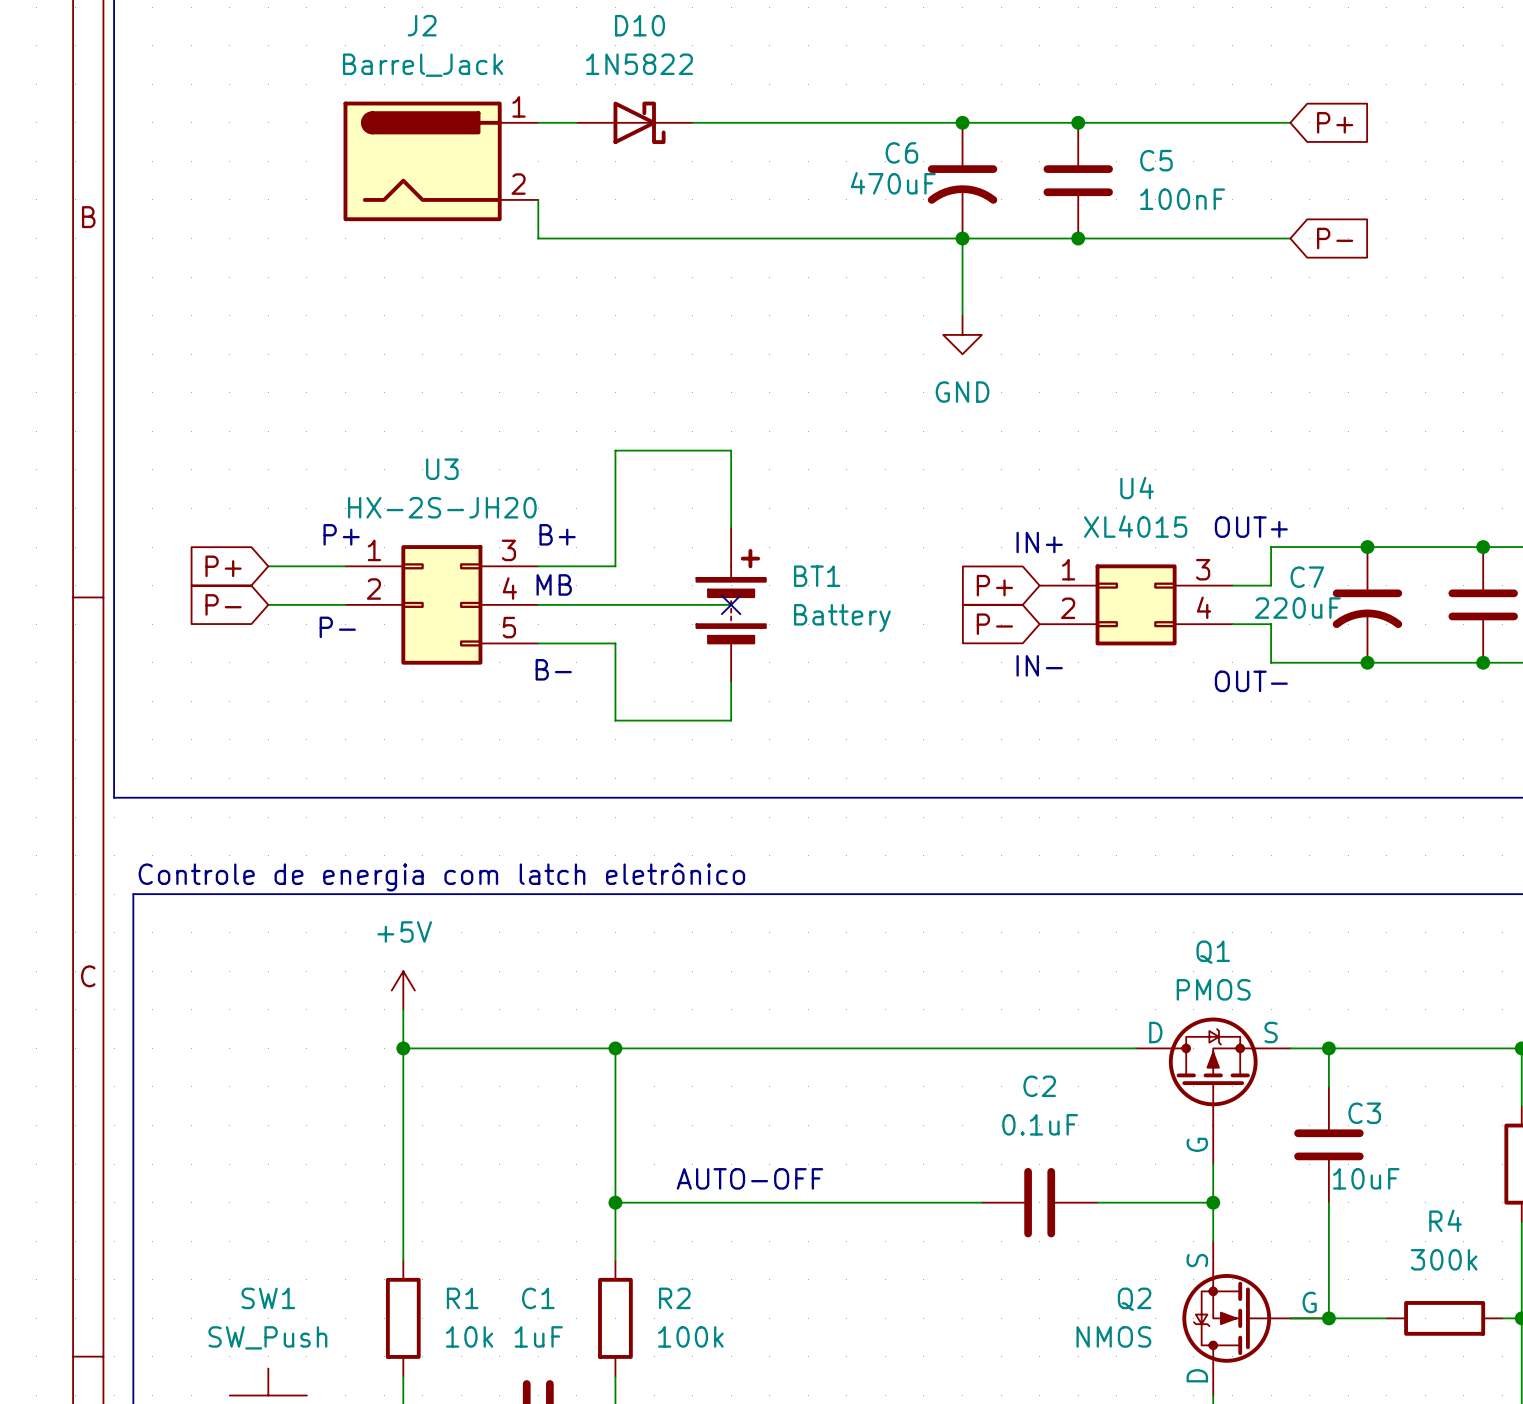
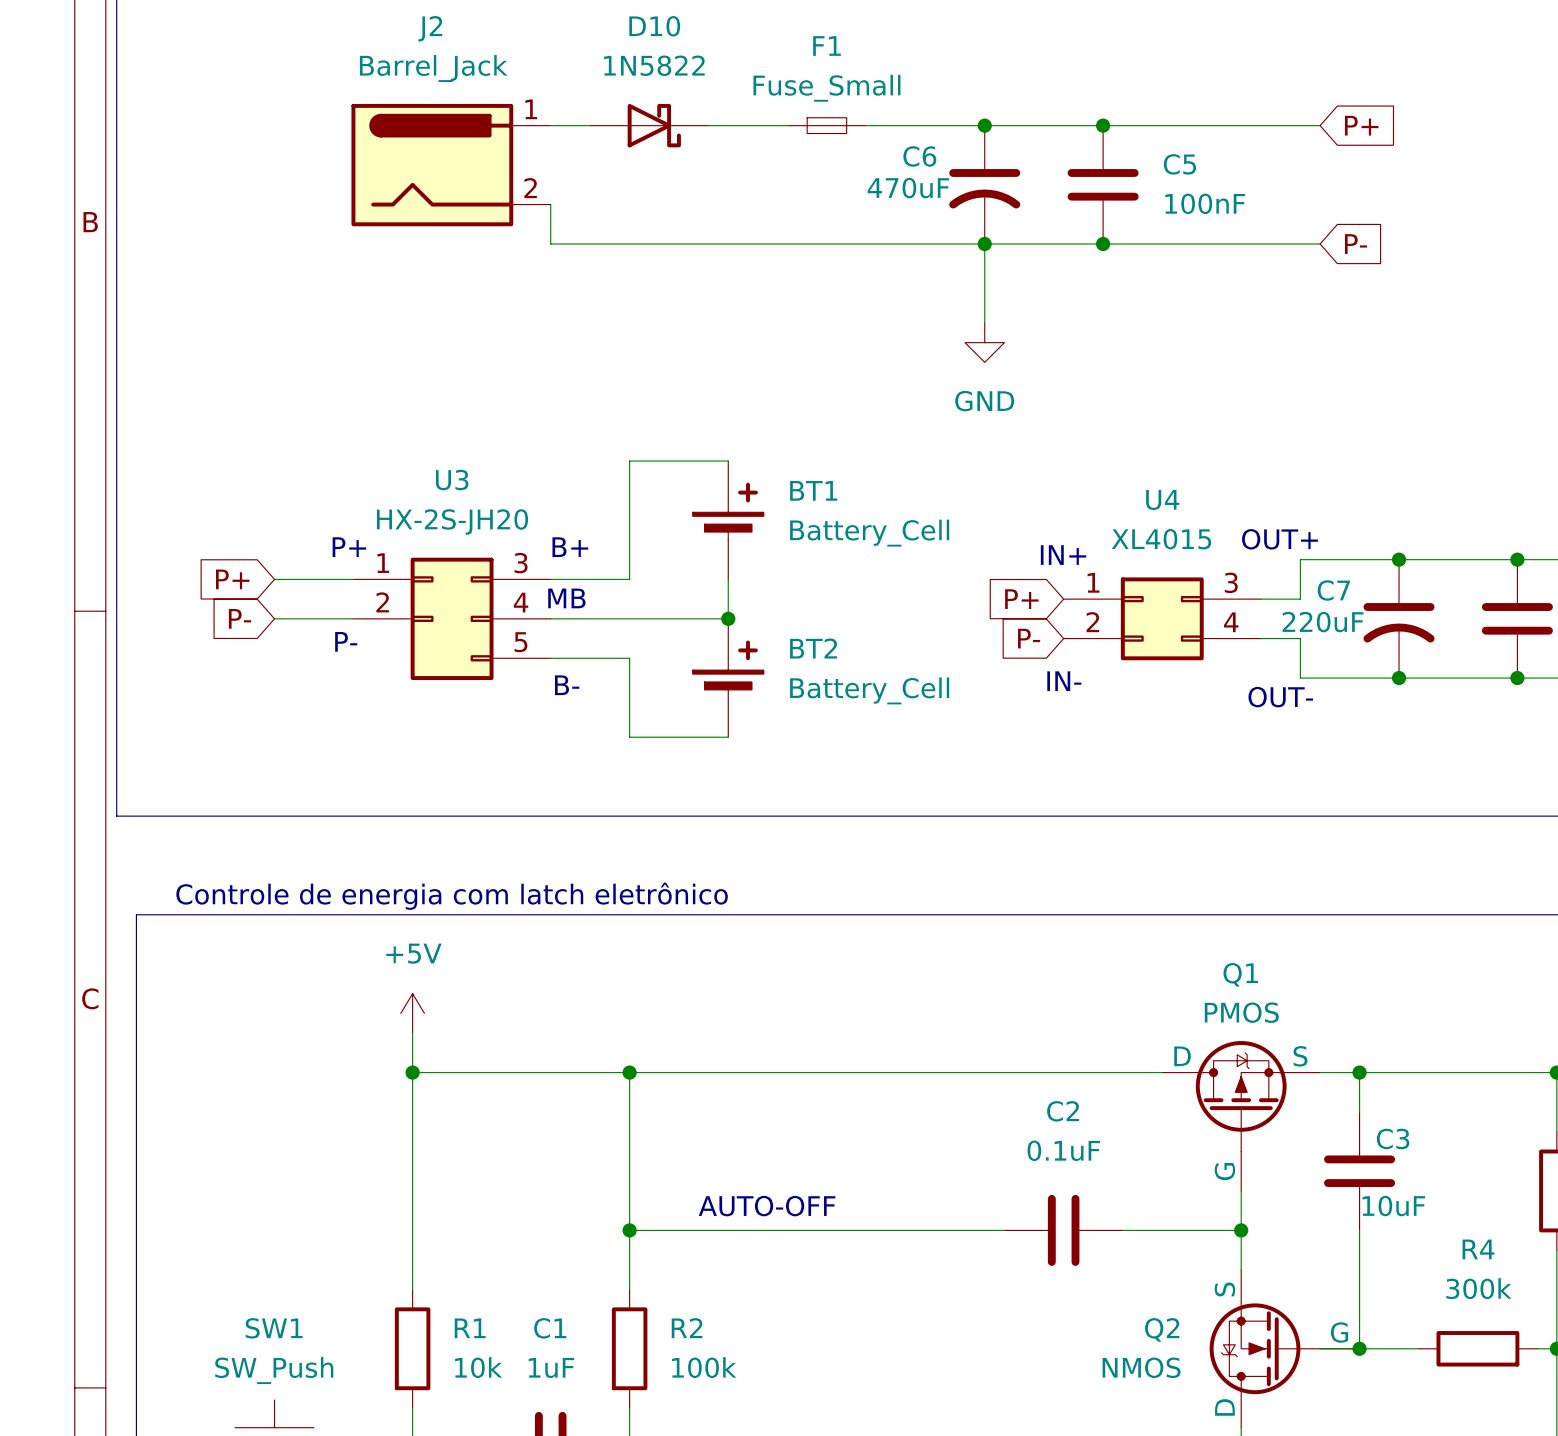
F1: none -> Fuse_Small (826, 125)
wire: (711, 450) (731, 450) (731, 527) -> none
BT1 symbol: [696, 527, 766, 683] -> [692, 461, 764, 580]
wire: (711, 604) (731, 604) -> (728, 618) (728, 579)
junction: none -> (728, 618)
no-connect mark: (731, 604) -> none
BT1 value: Battery (842, 617) -> Battery_Cell (869, 533)
BT2: none -> Battery_Cell (728, 678)
wire: (731, 682) (731, 720) (711, 720) -> none

